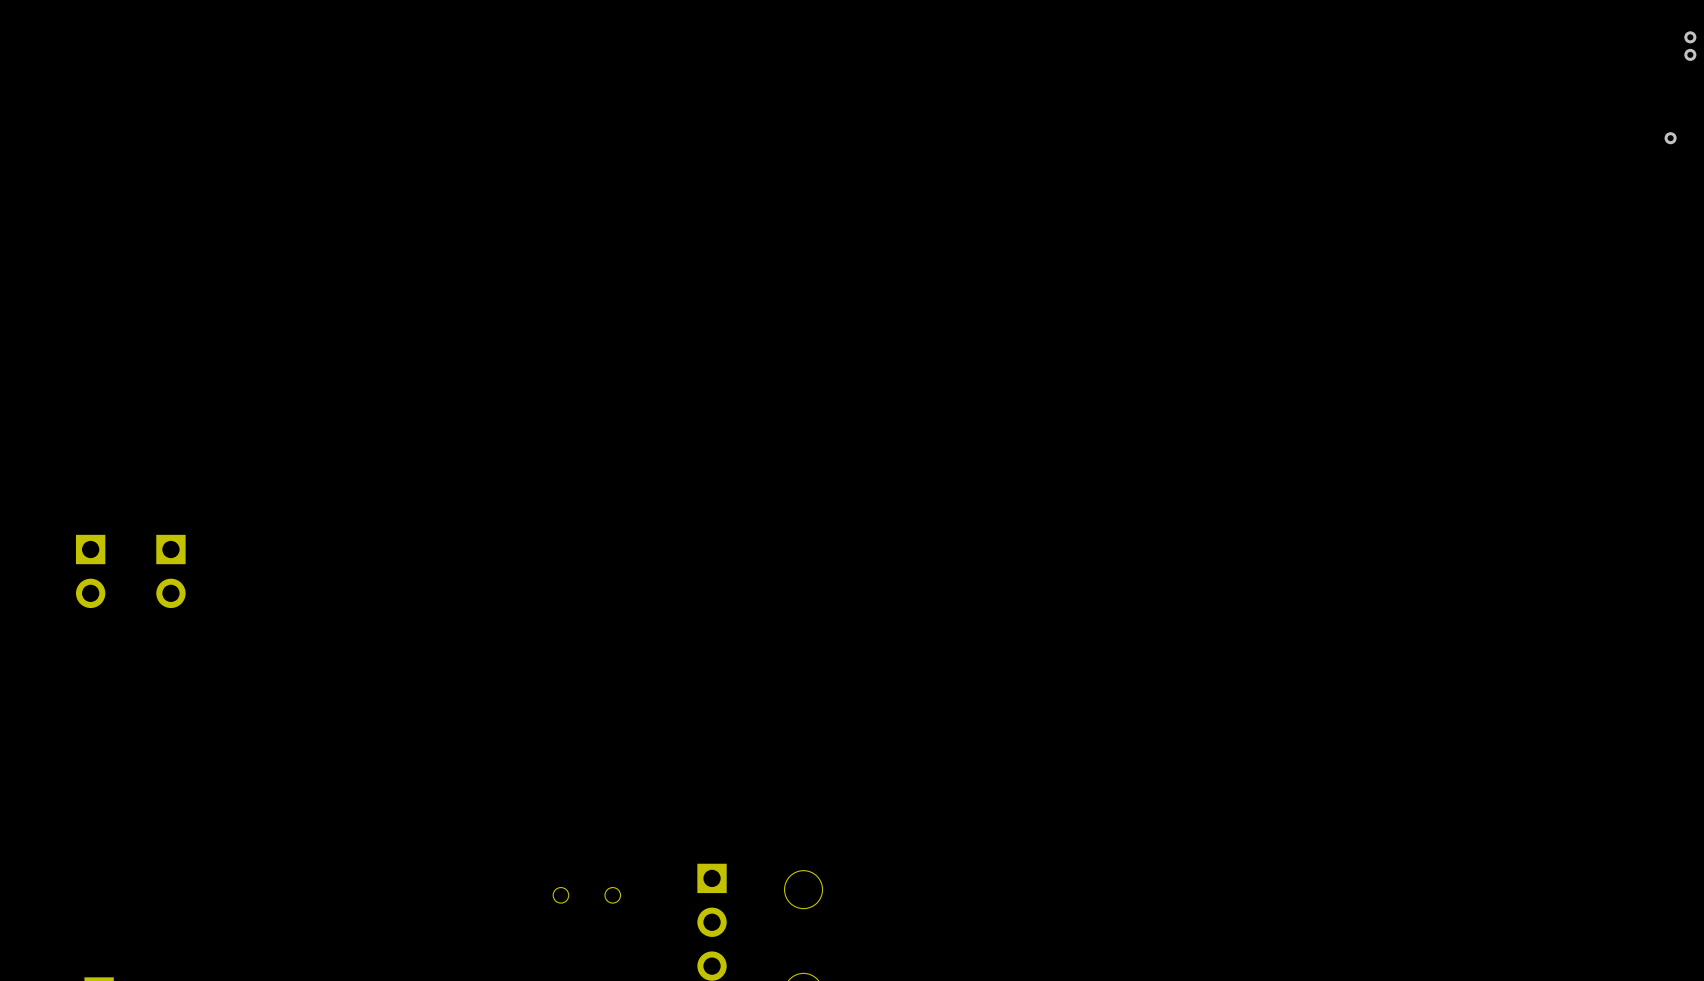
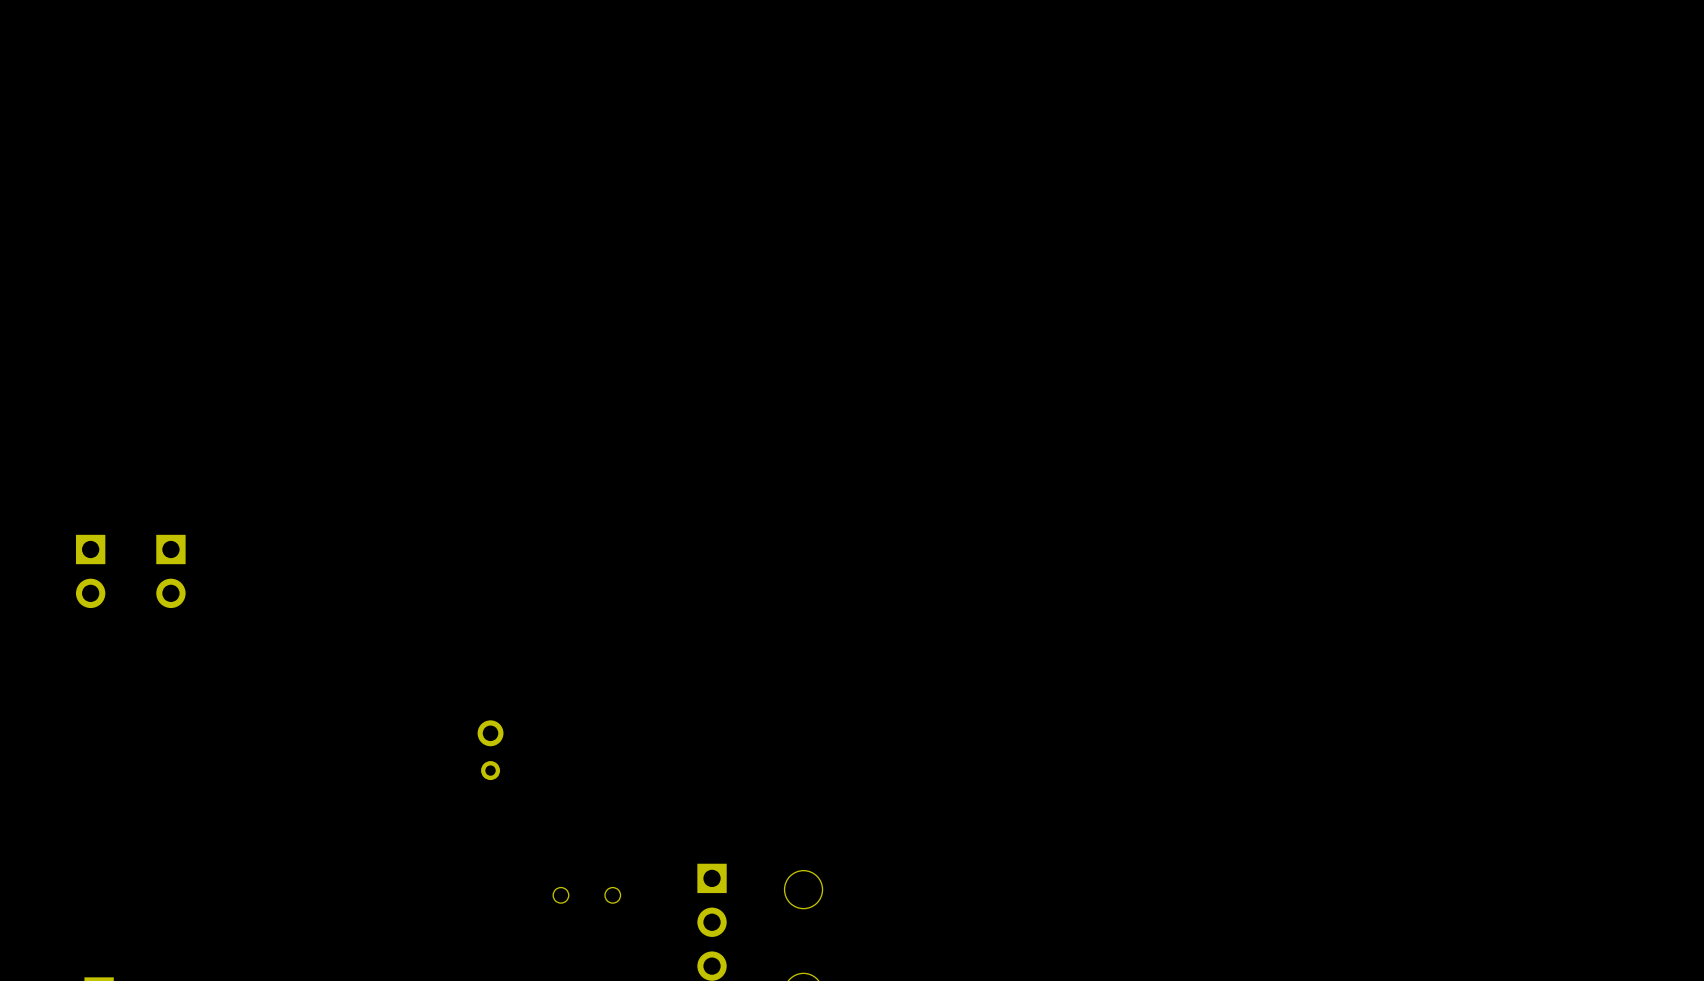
via: (1690, 37) -> none
via: (1690, 54) -> none
via: (1670, 138) -> none
part: none -> (490, 750)

